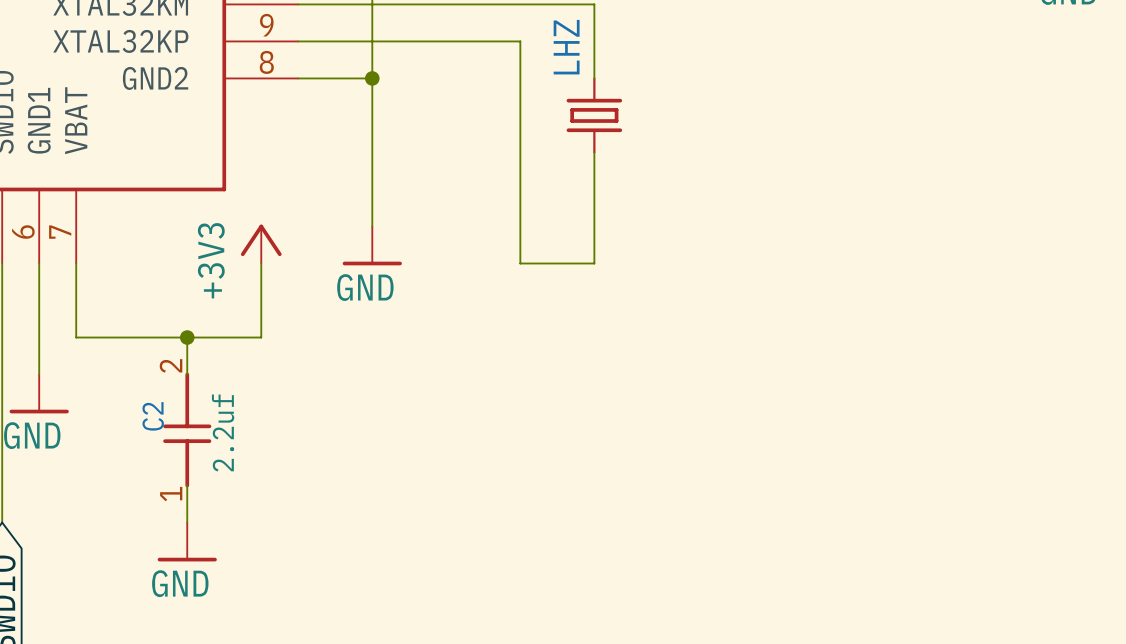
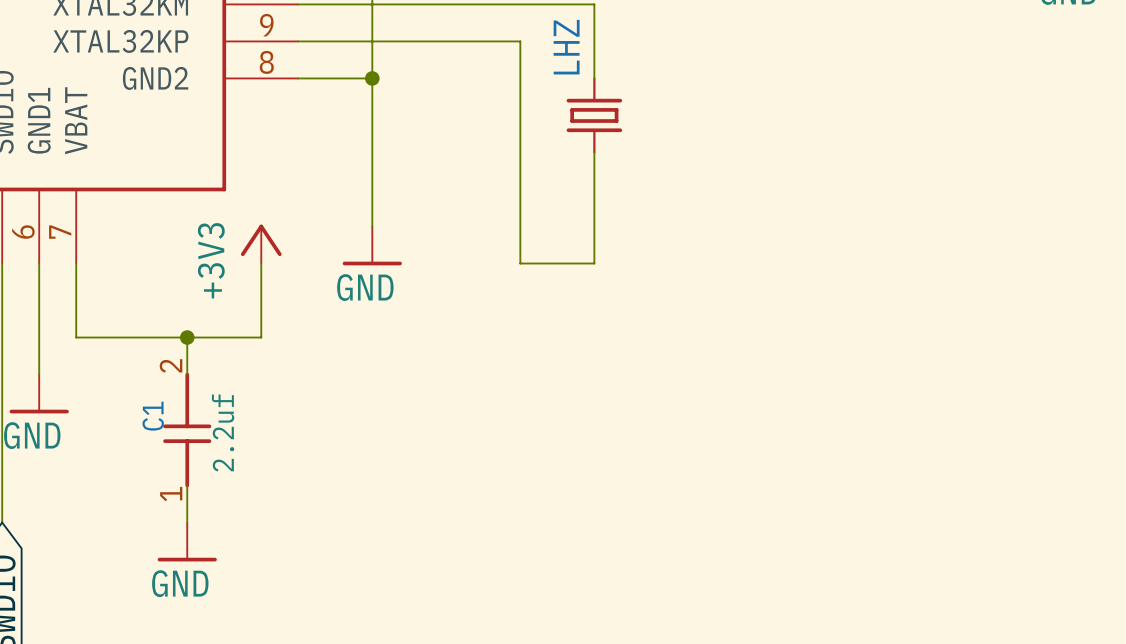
C2 name: C2 (153, 416) -> C1 (153, 416)

